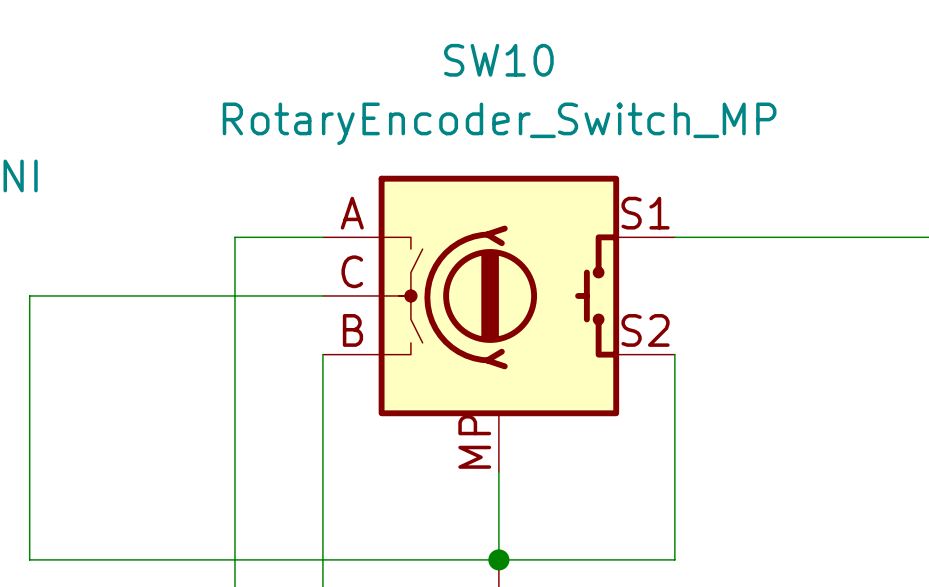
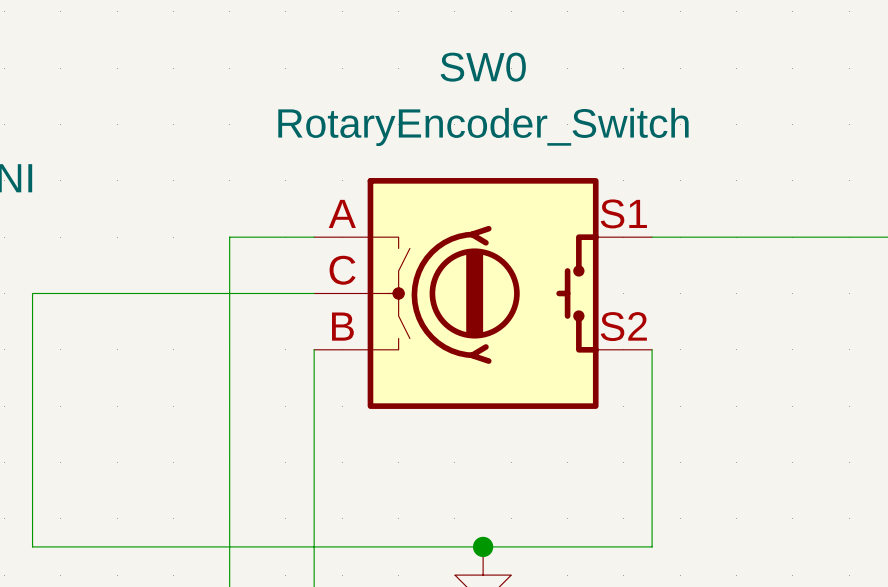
SW0: none -> RotaryEncoder_Switch (483, 293)
SW10: RotaryEncoder_Switch_MP (498, 323) -> none
wire: (498, 471) (498, 559) -> none

